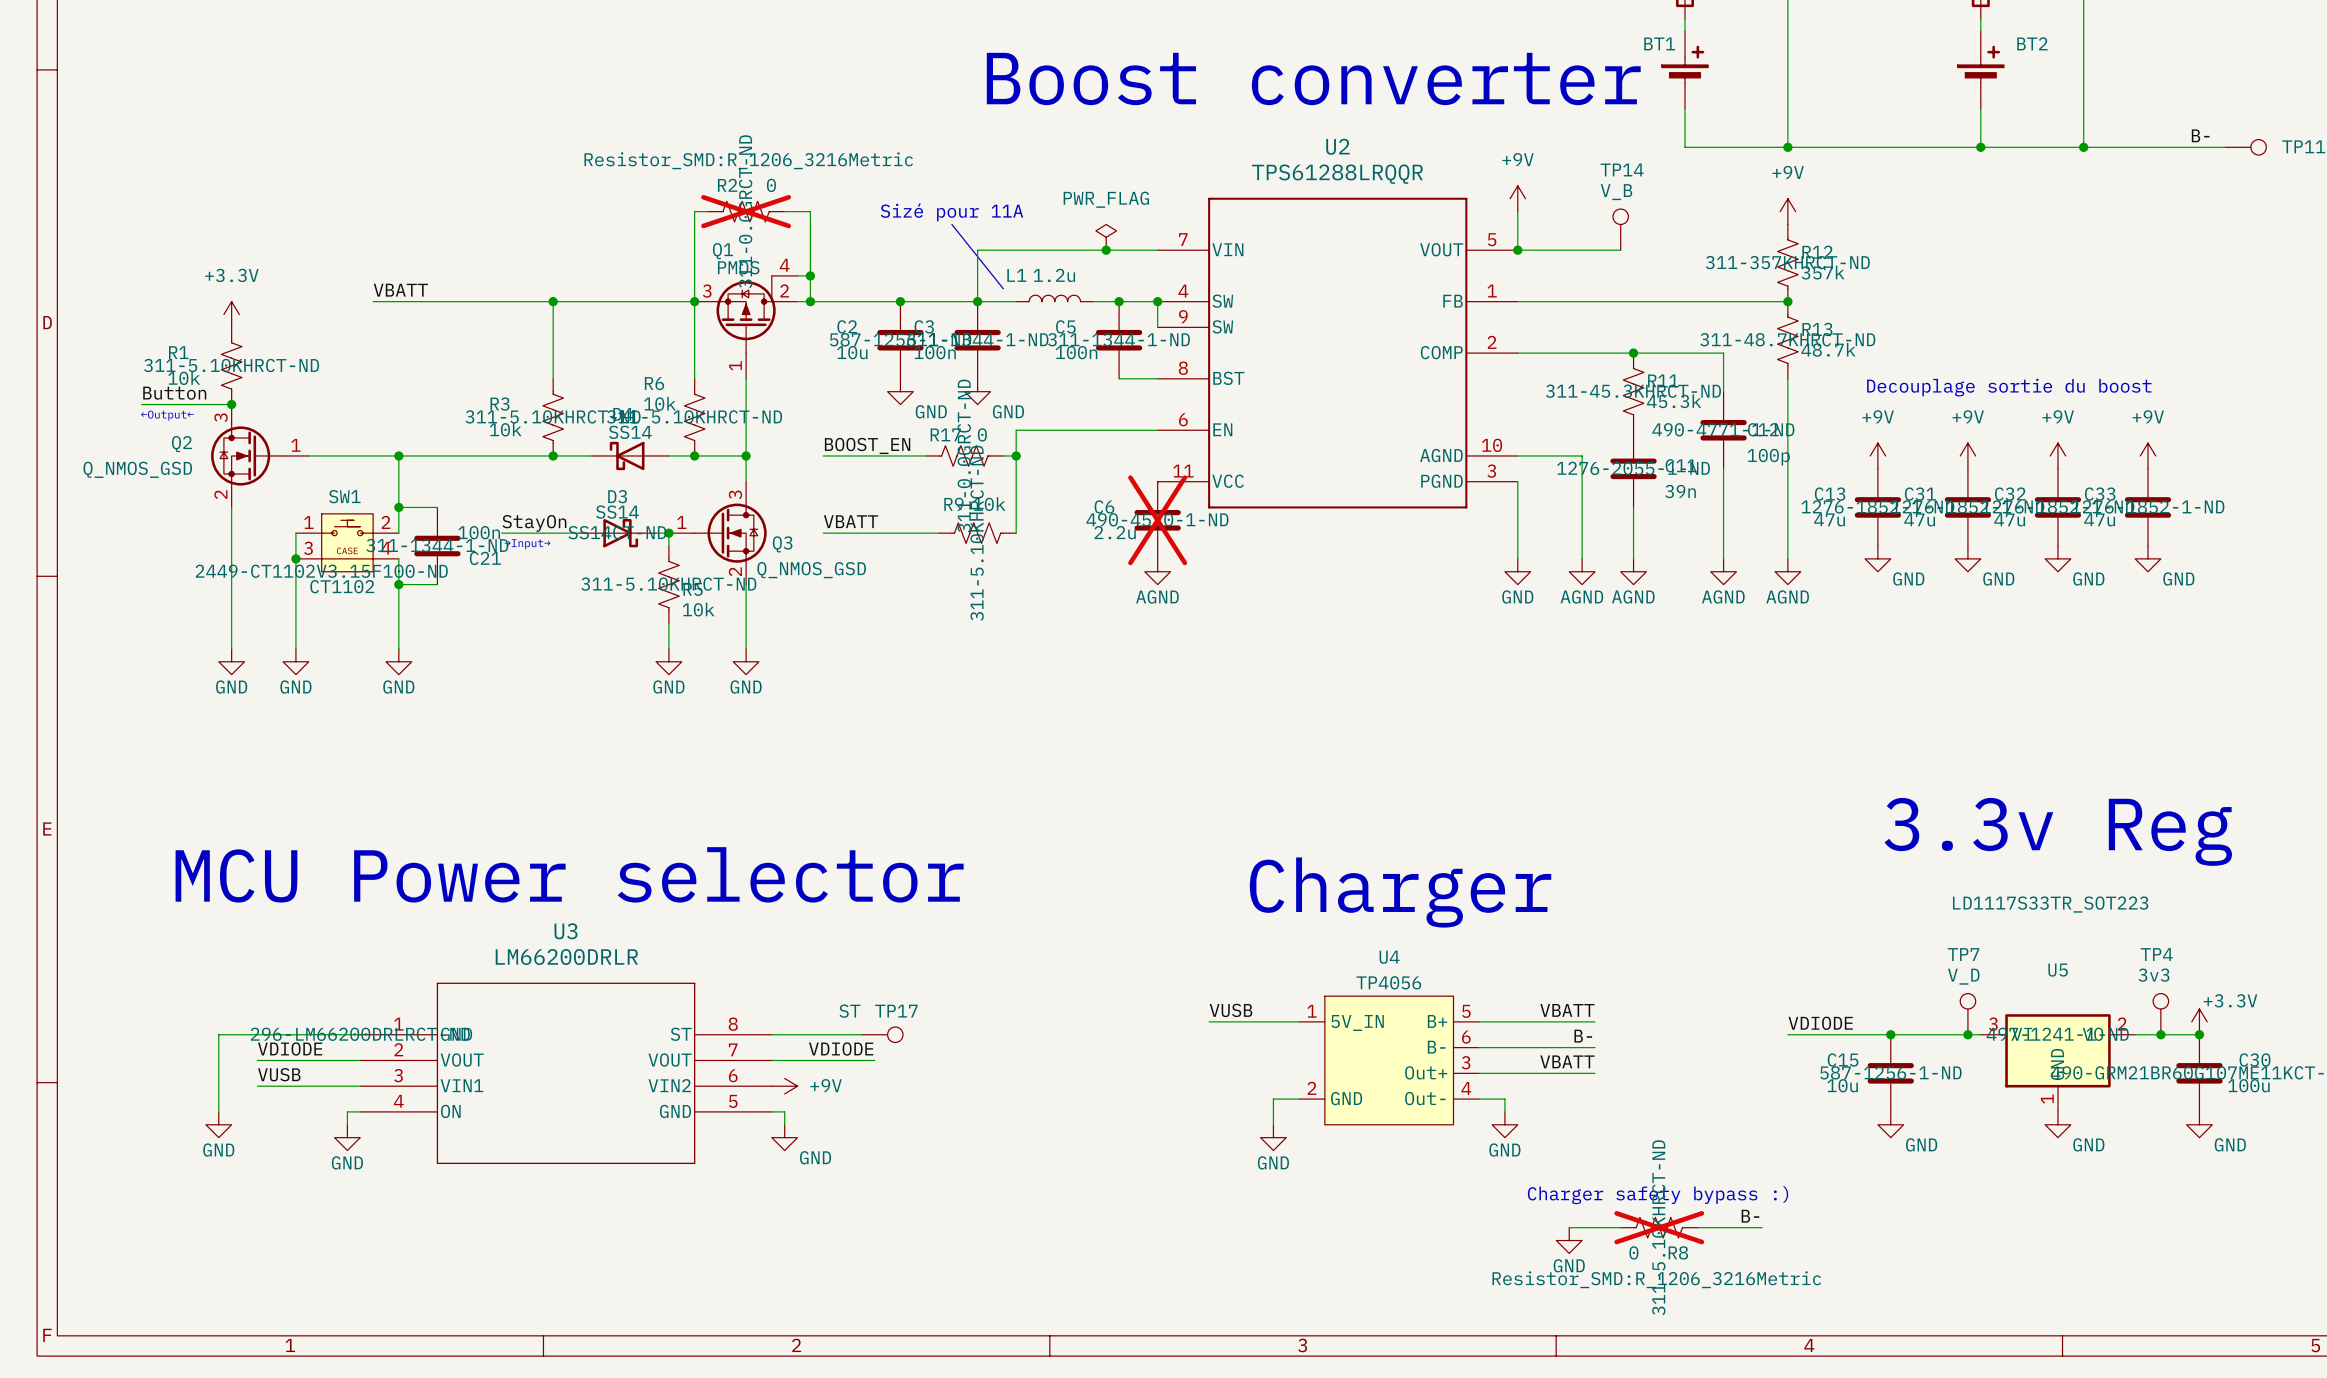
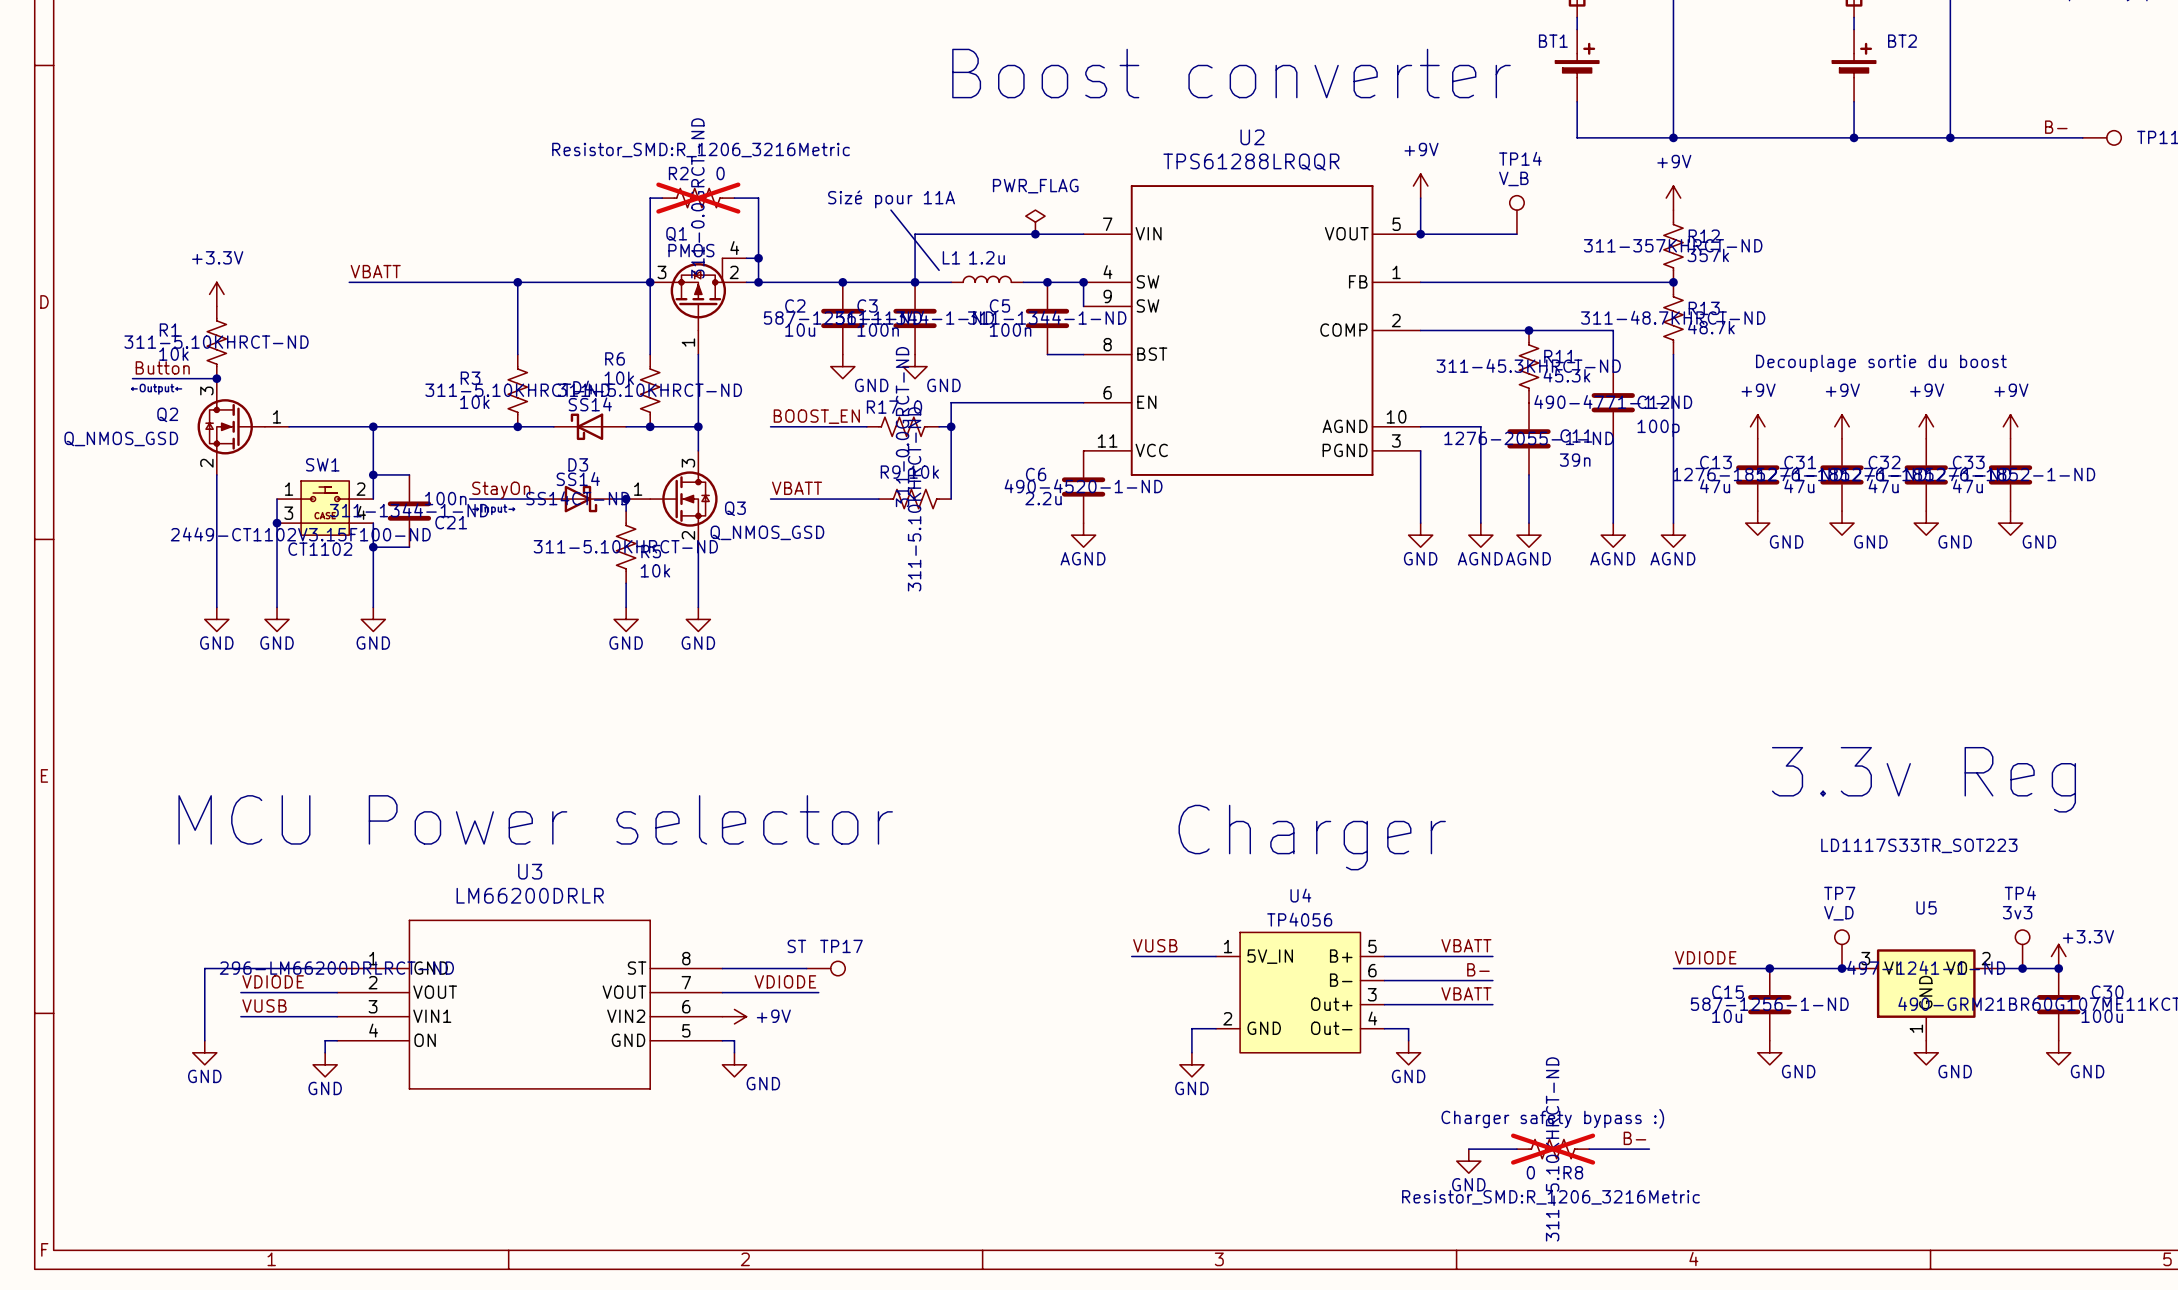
C6 do-not-place cross: (1157, 520) -> none

